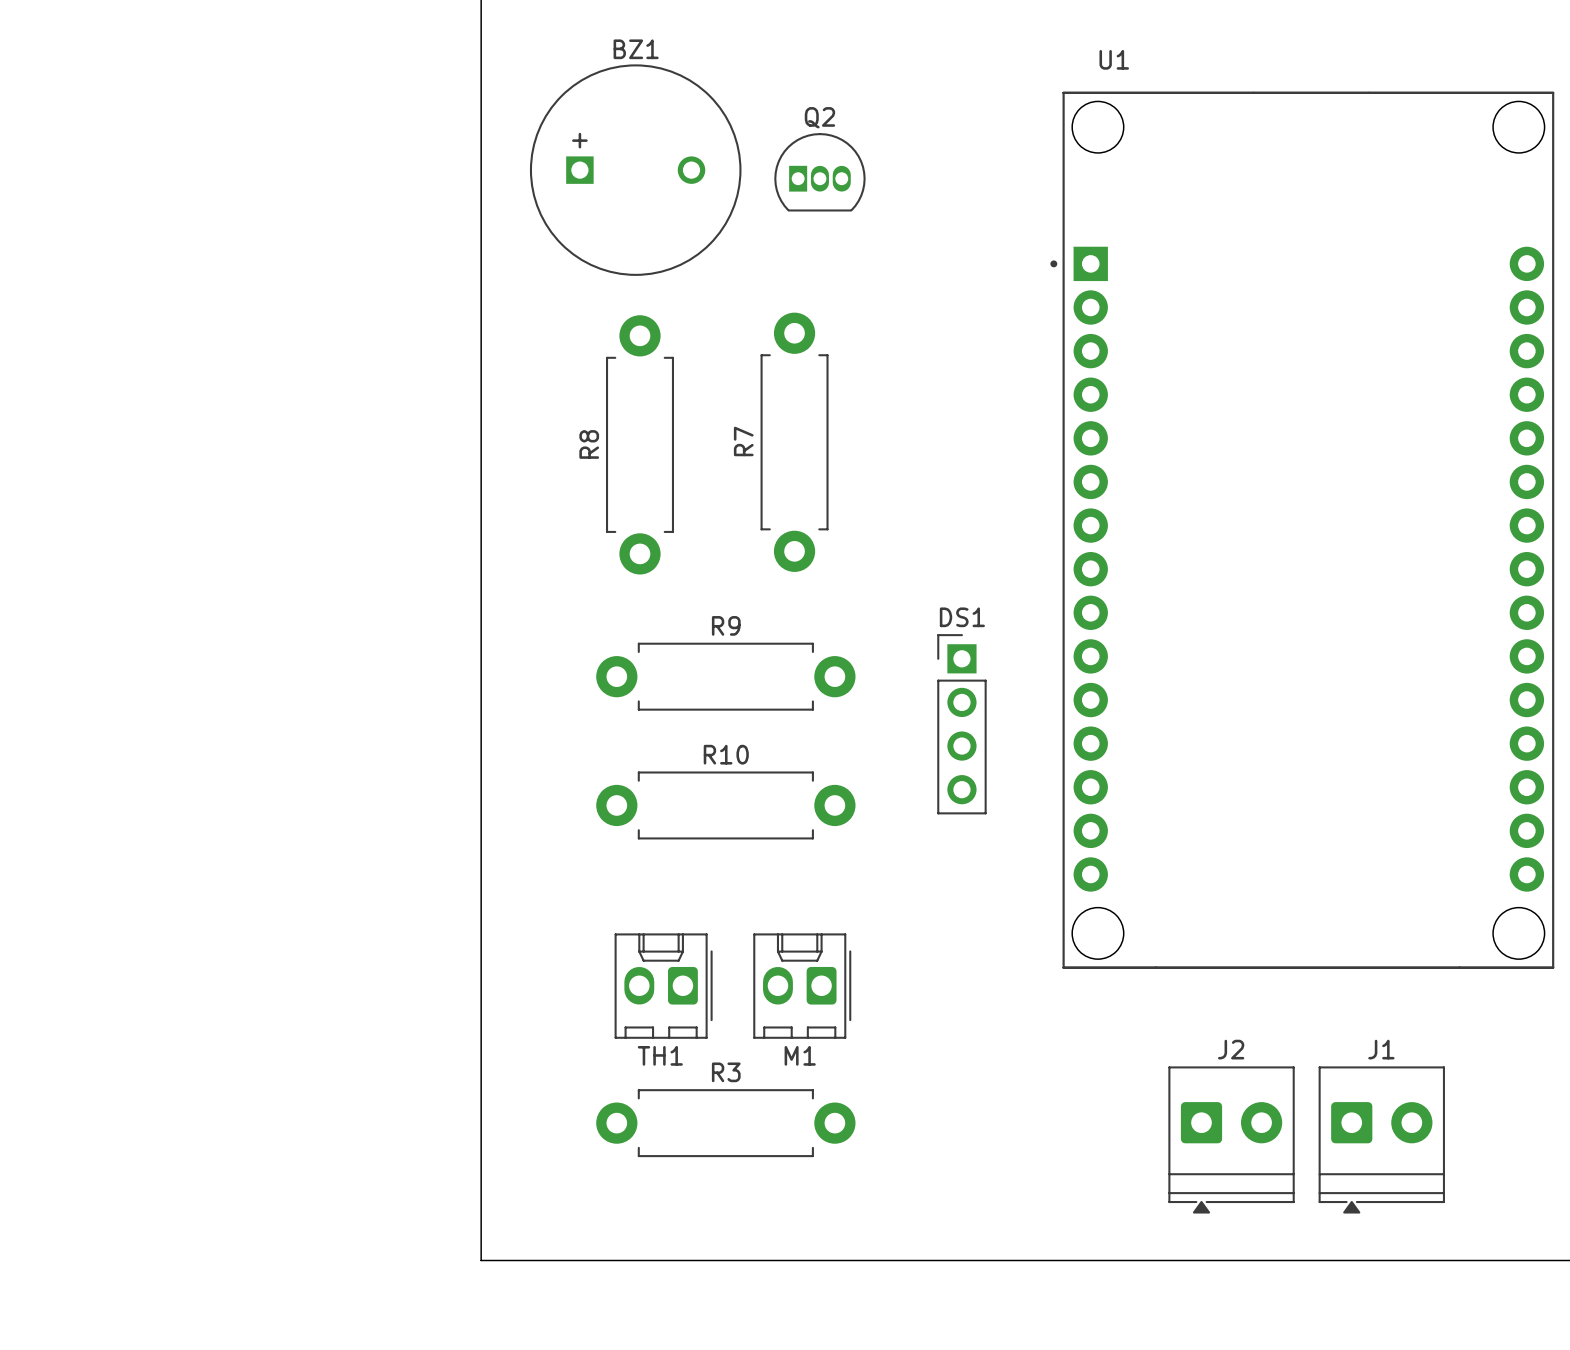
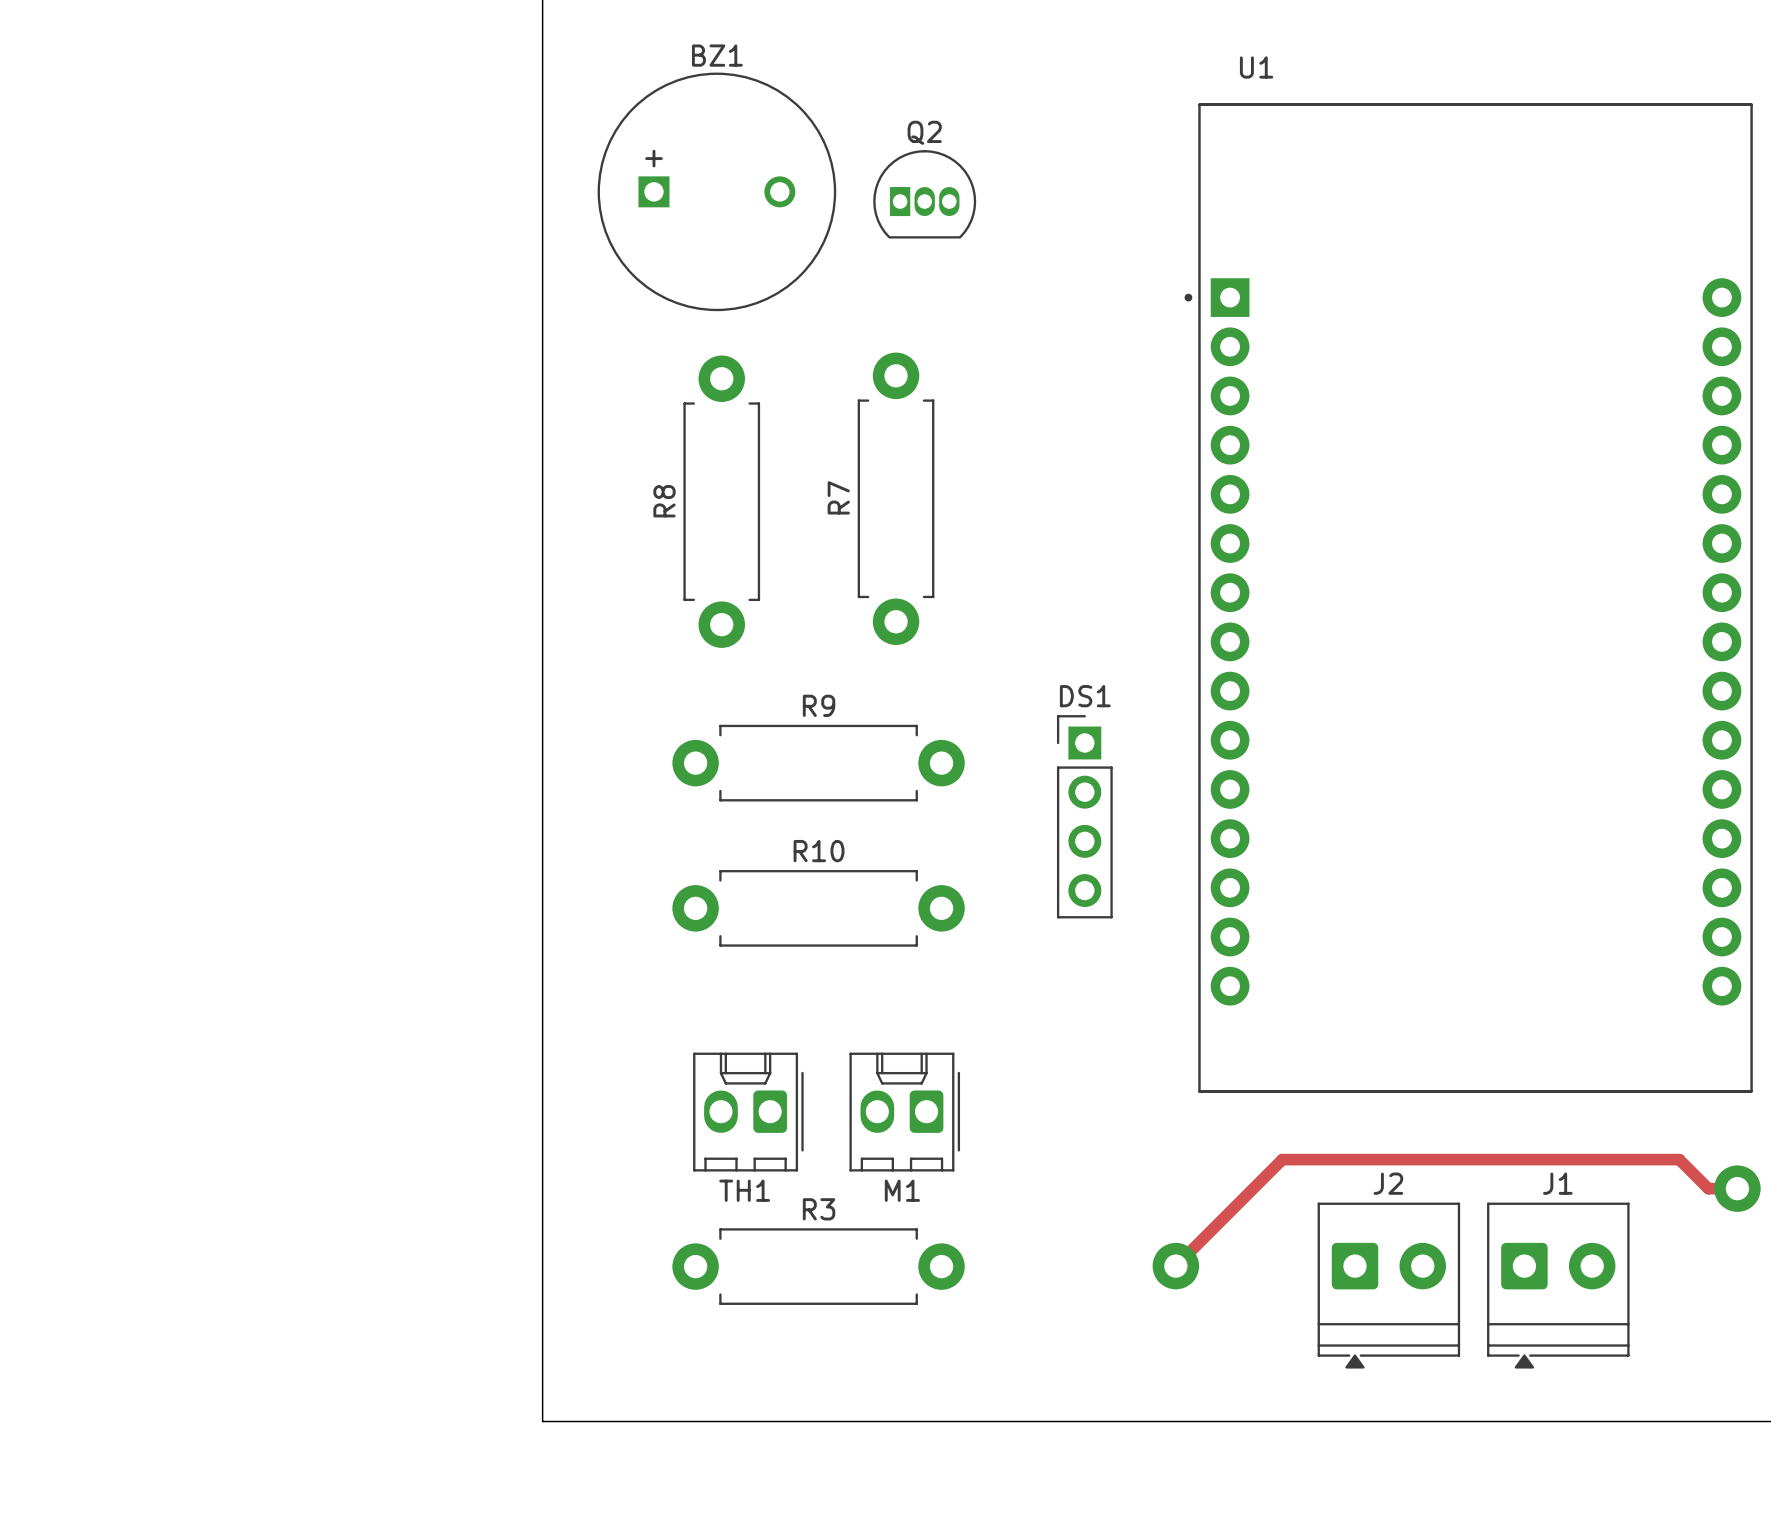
U1 footprint: [1050, 91, 1555, 969] -> [1184, 103, 1753, 1093]
track: none -> (1737, 1188) (1708, 1188) (1679, 1159) (1282, 1159) (1175, 1266)
via: none -> (1737, 1188)
via: none -> (1175, 1266)

